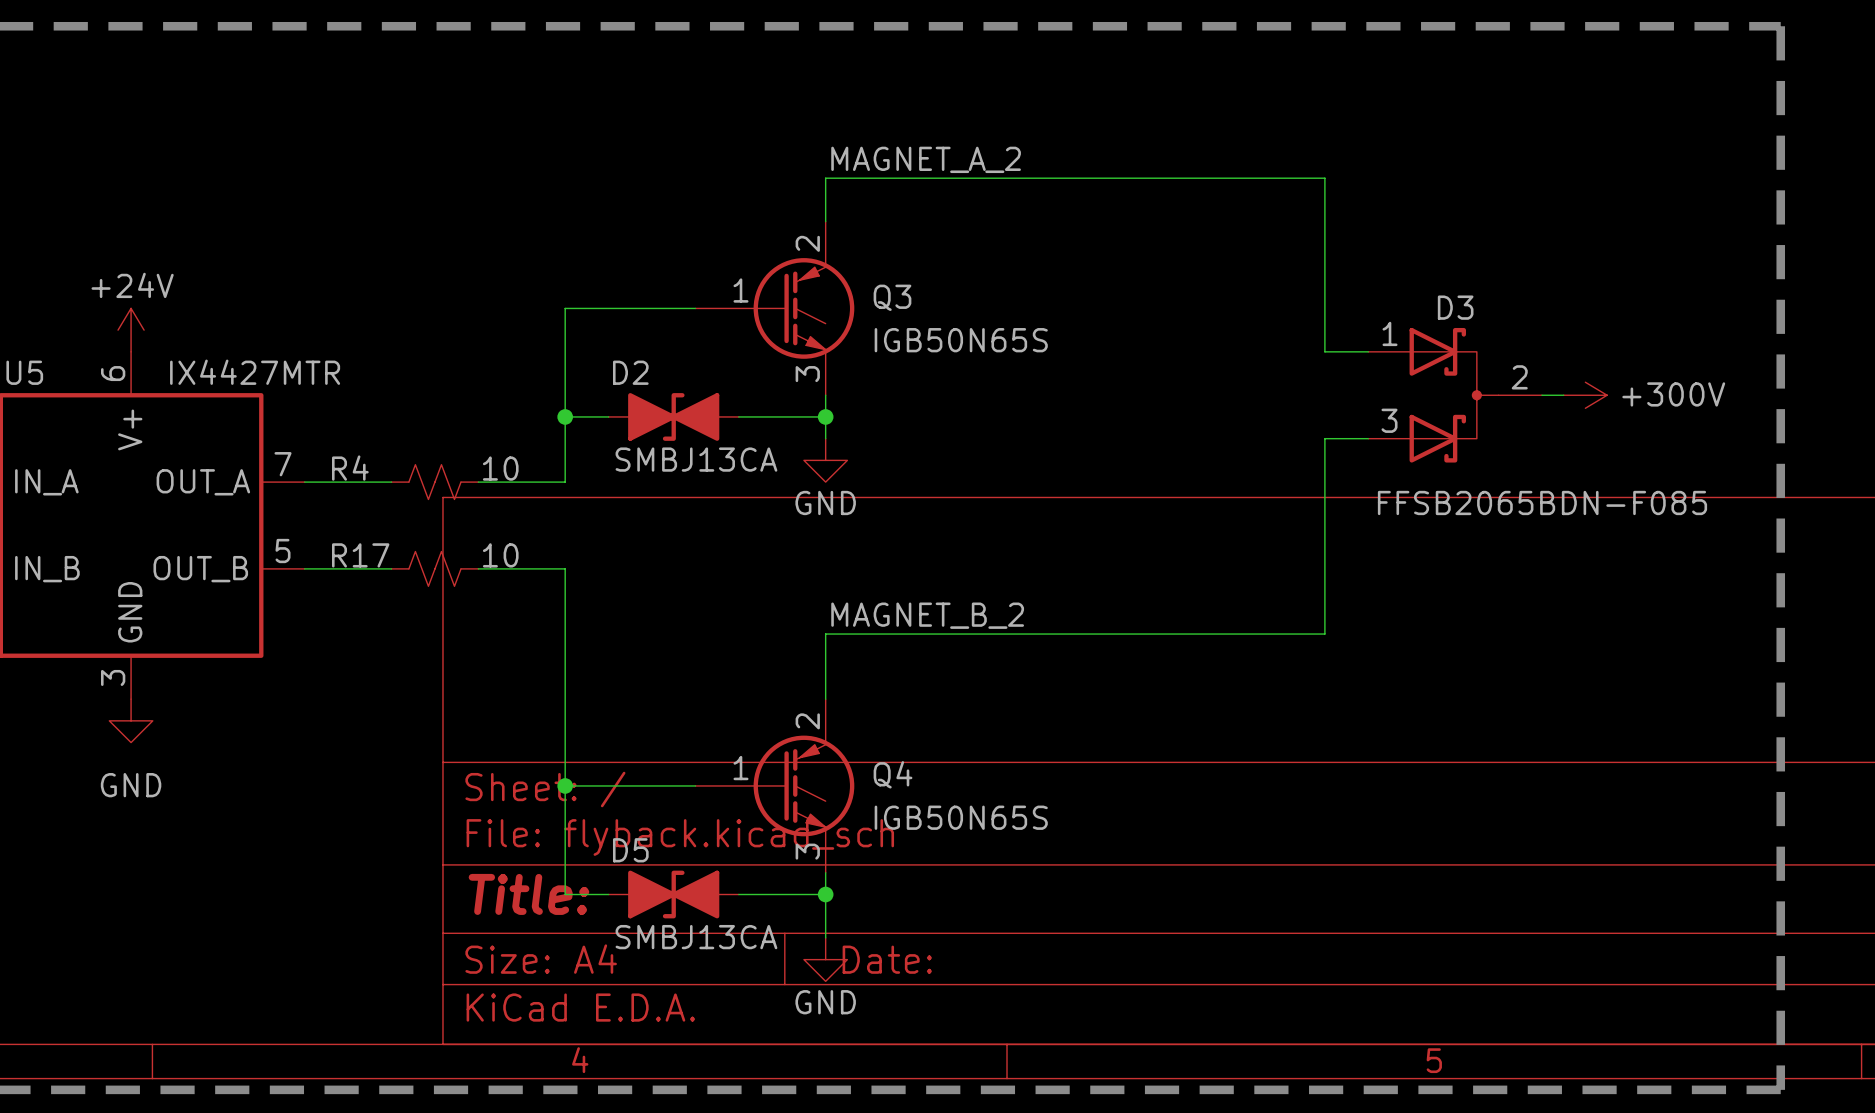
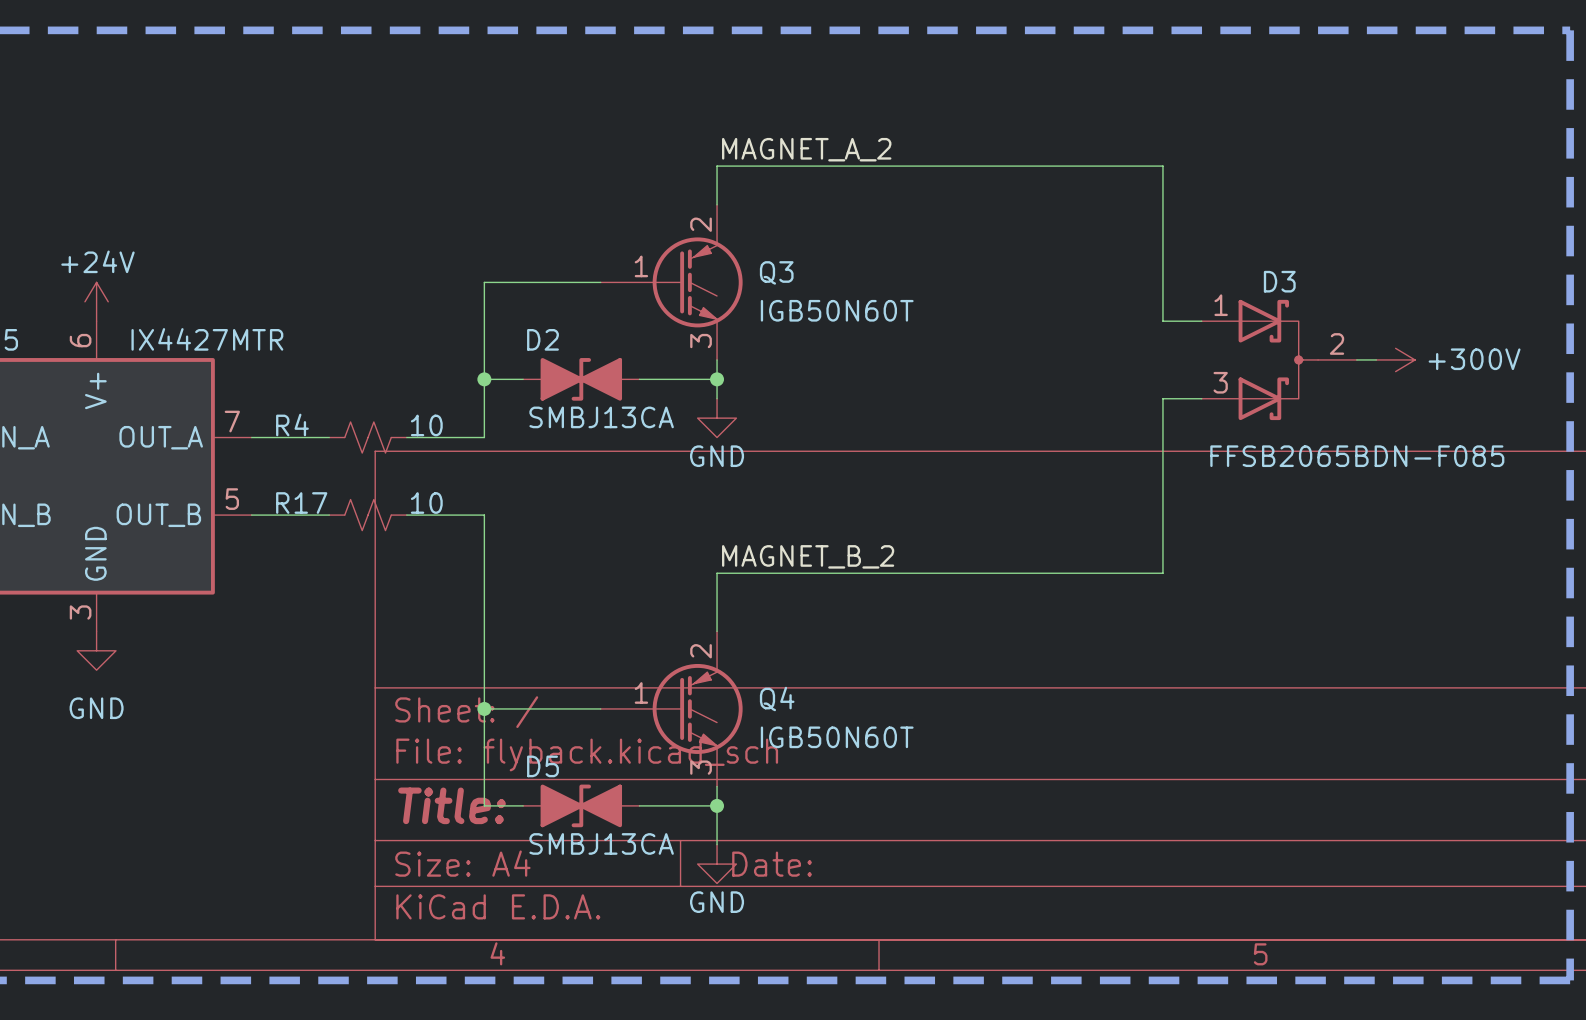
Q3 value: IGB50N65S (961, 340) -> IGB50N60T (837, 310)
Q4 value: IGB50N65S (961, 817) -> IGB50N60T (837, 737)

